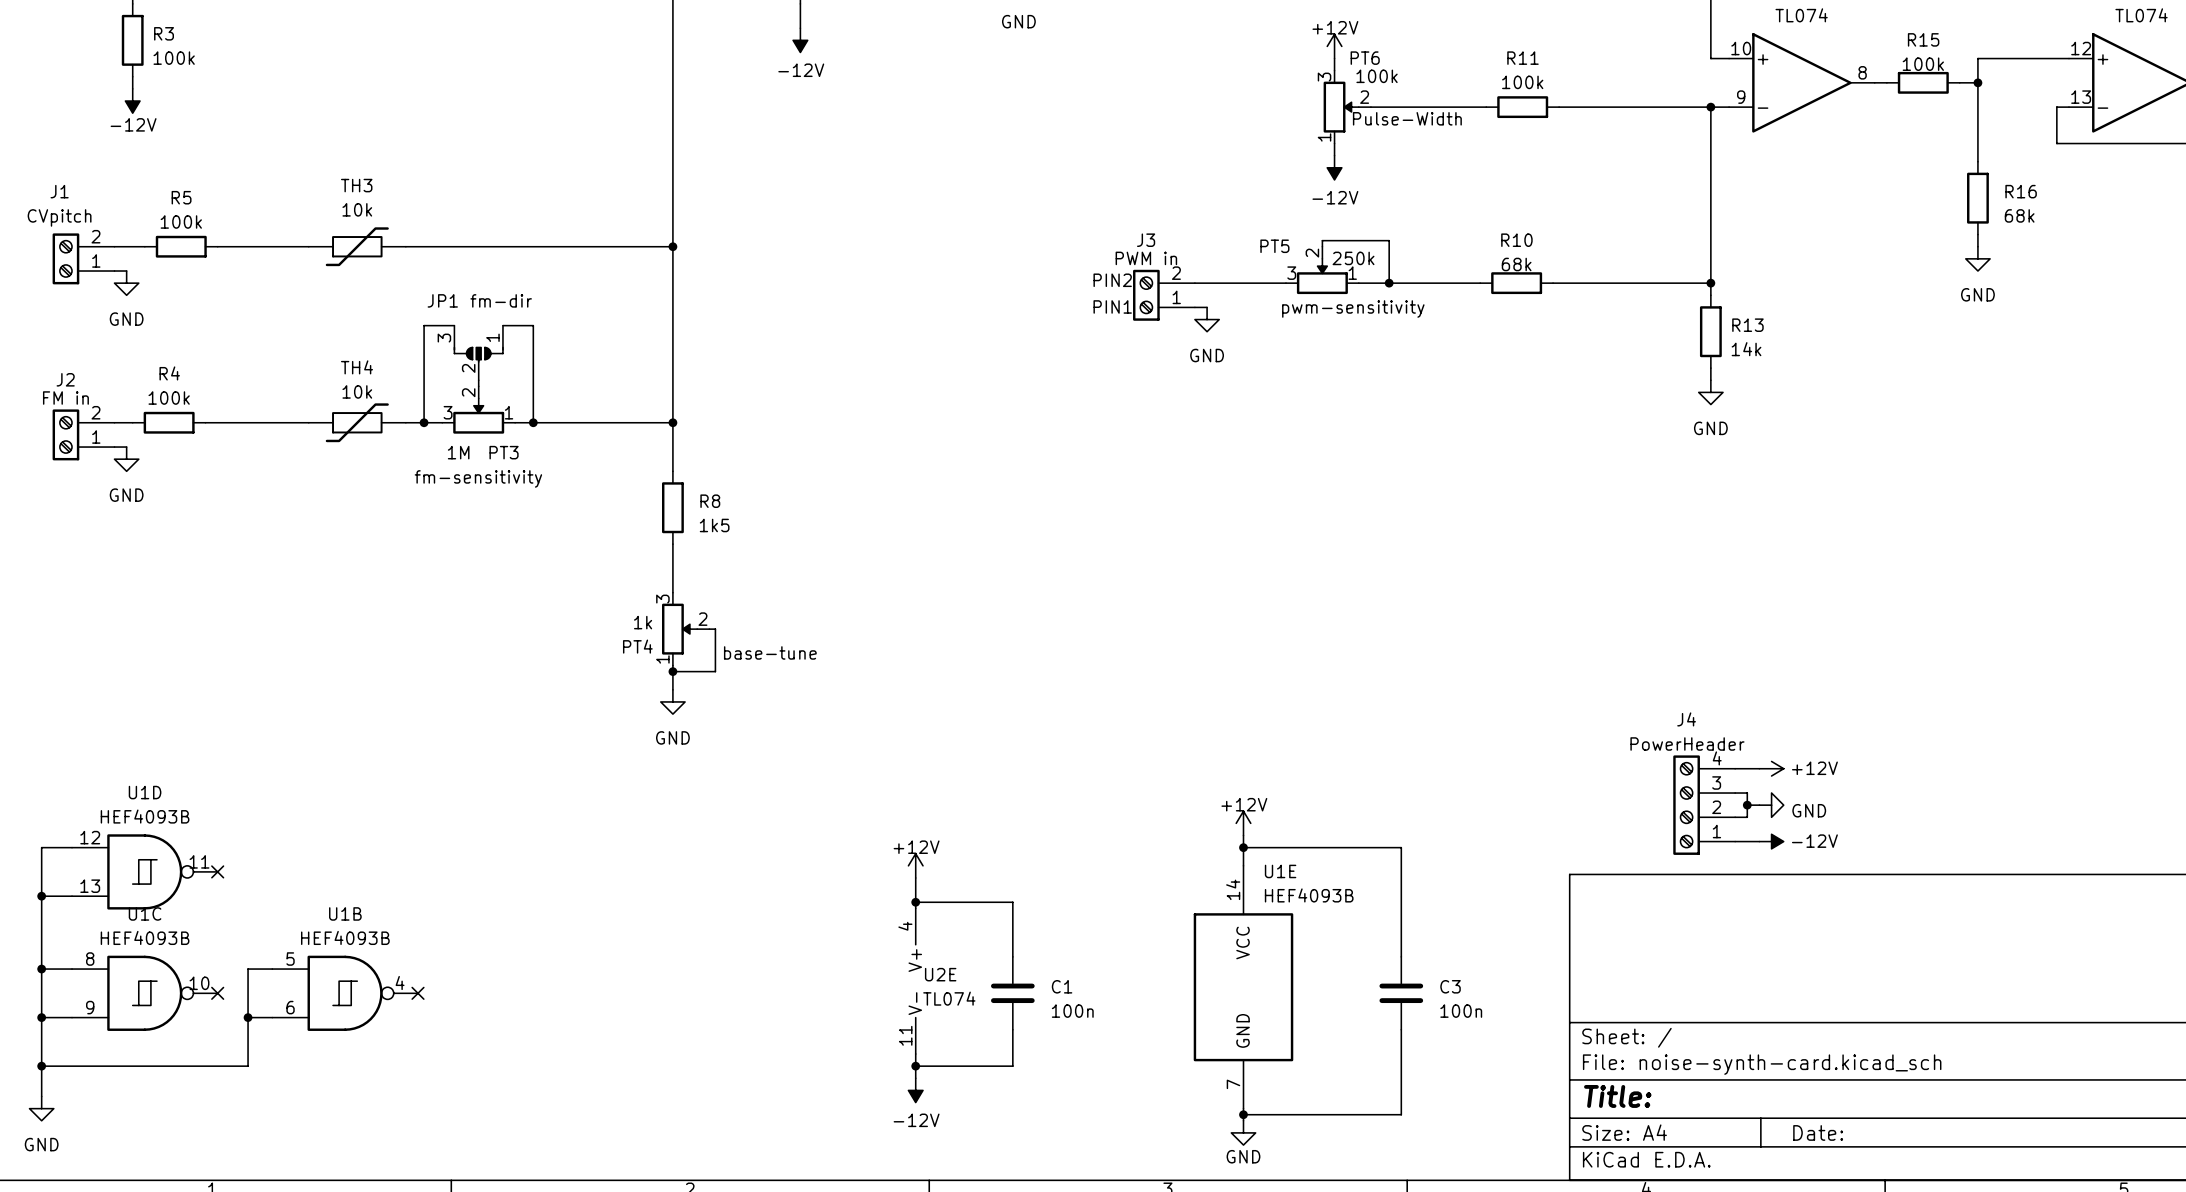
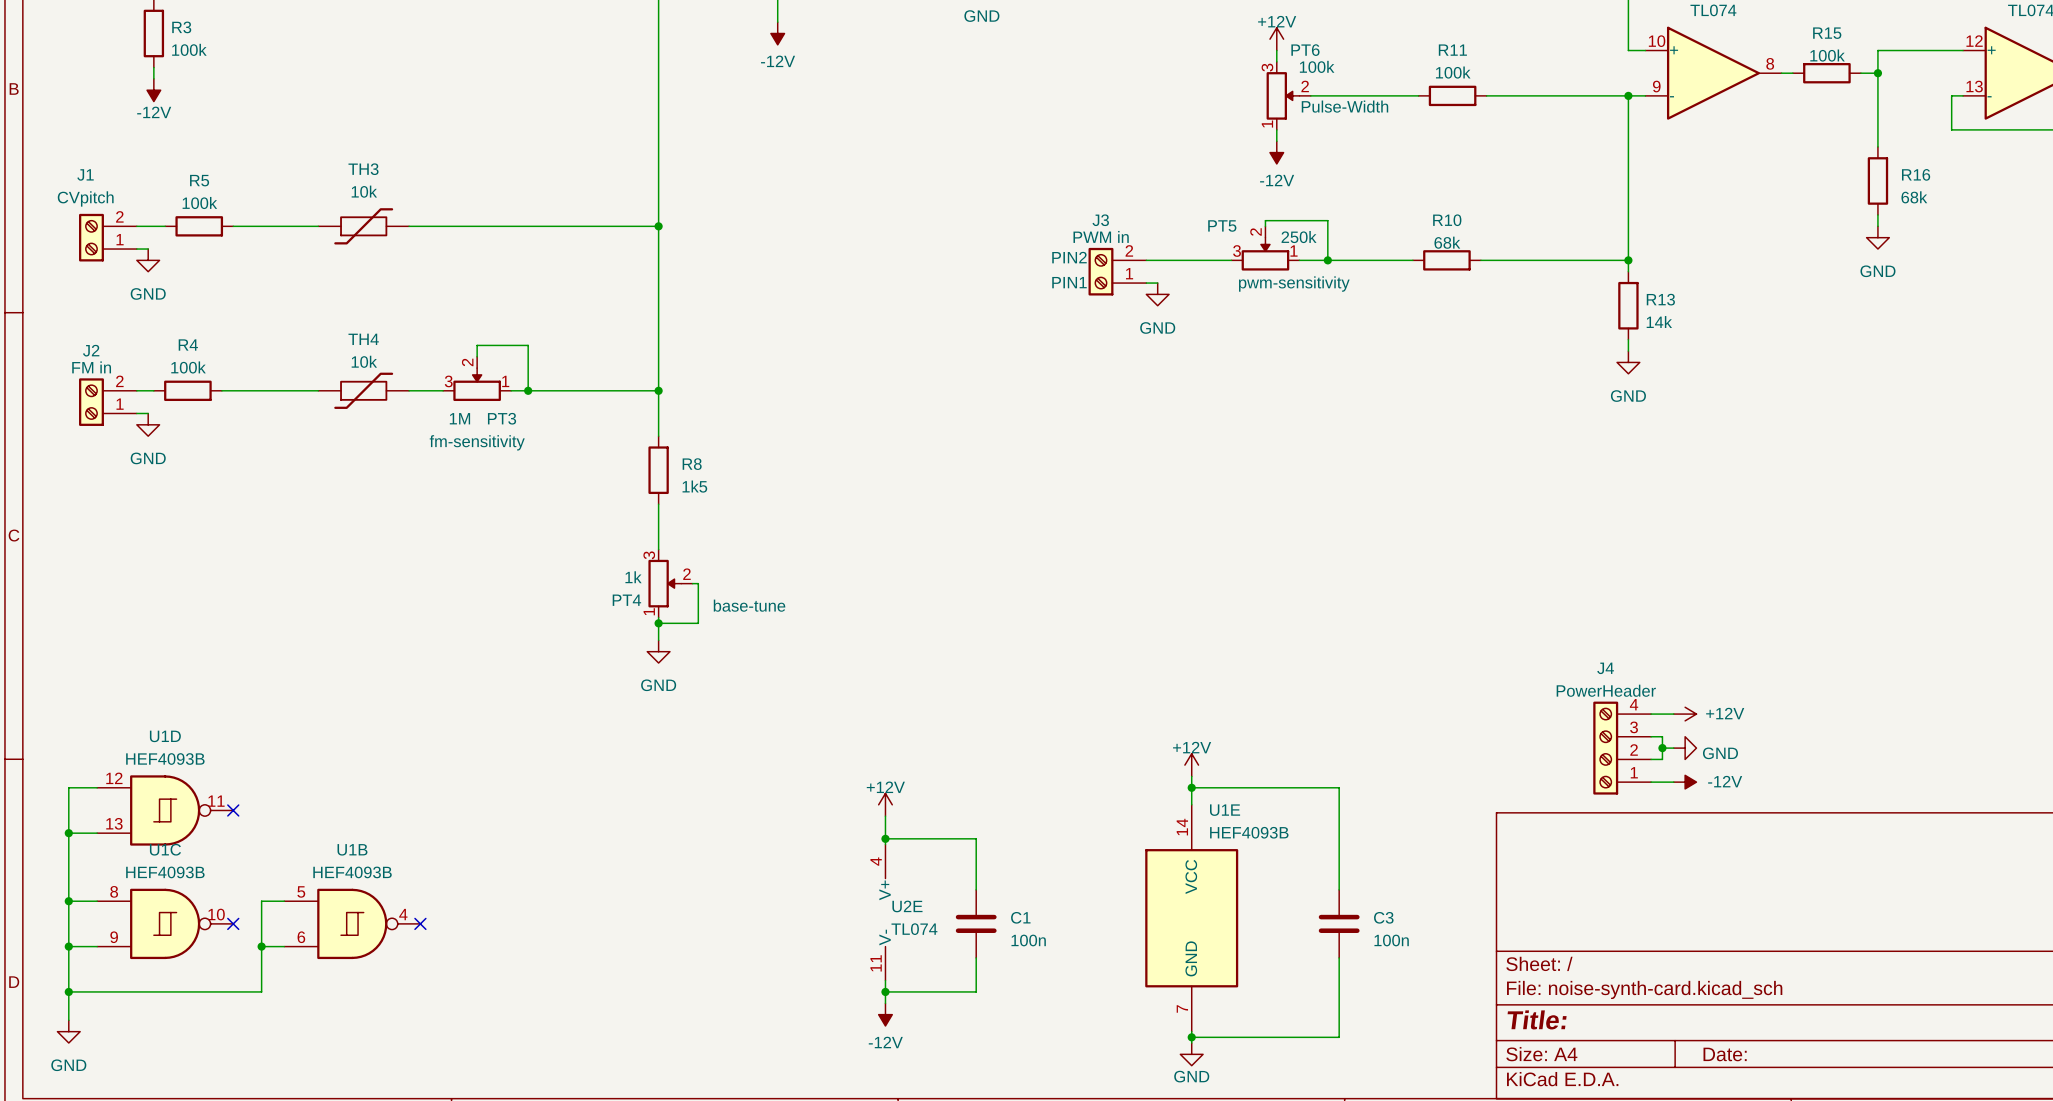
wire: (454, 325) (424, 325) (424, 422) -> none
wire: (502, 325) (533, 325) (533, 374) -> (477, 351) (477, 345) (528, 345)
JP1: fm-dir (478, 352) -> none
junction: (424, 422) -> none

